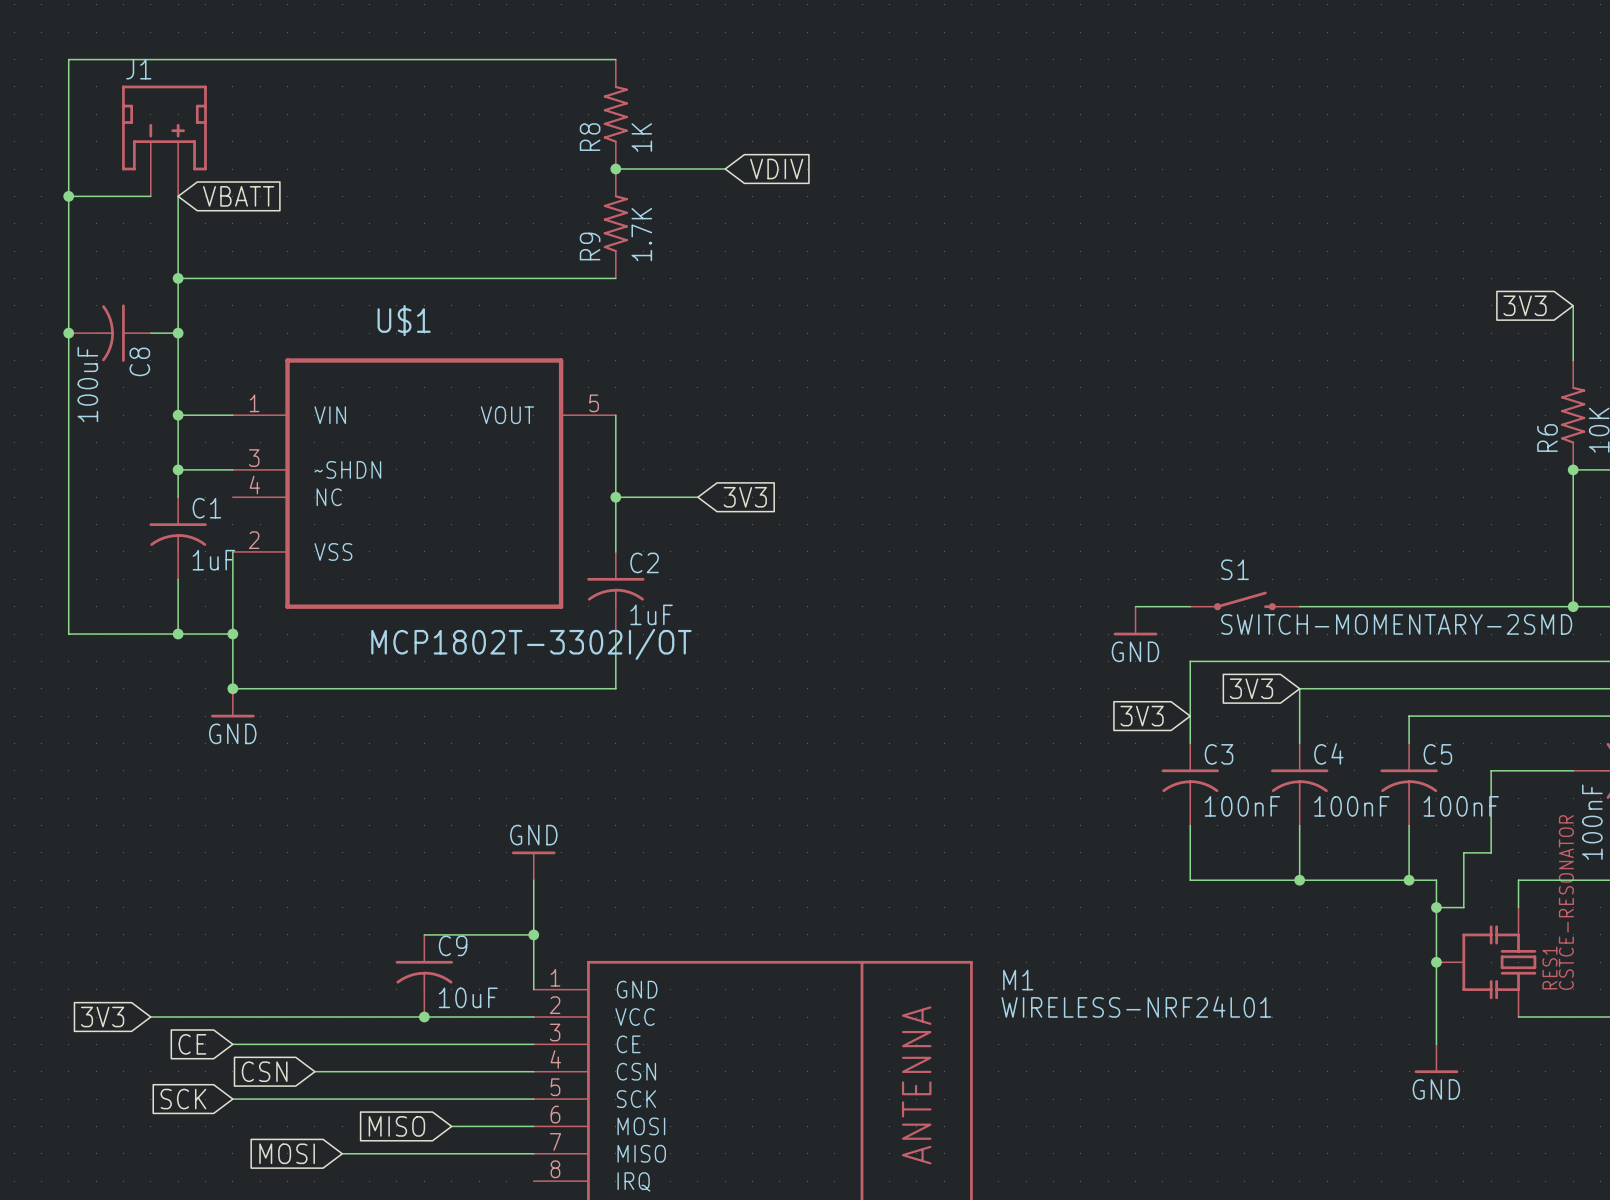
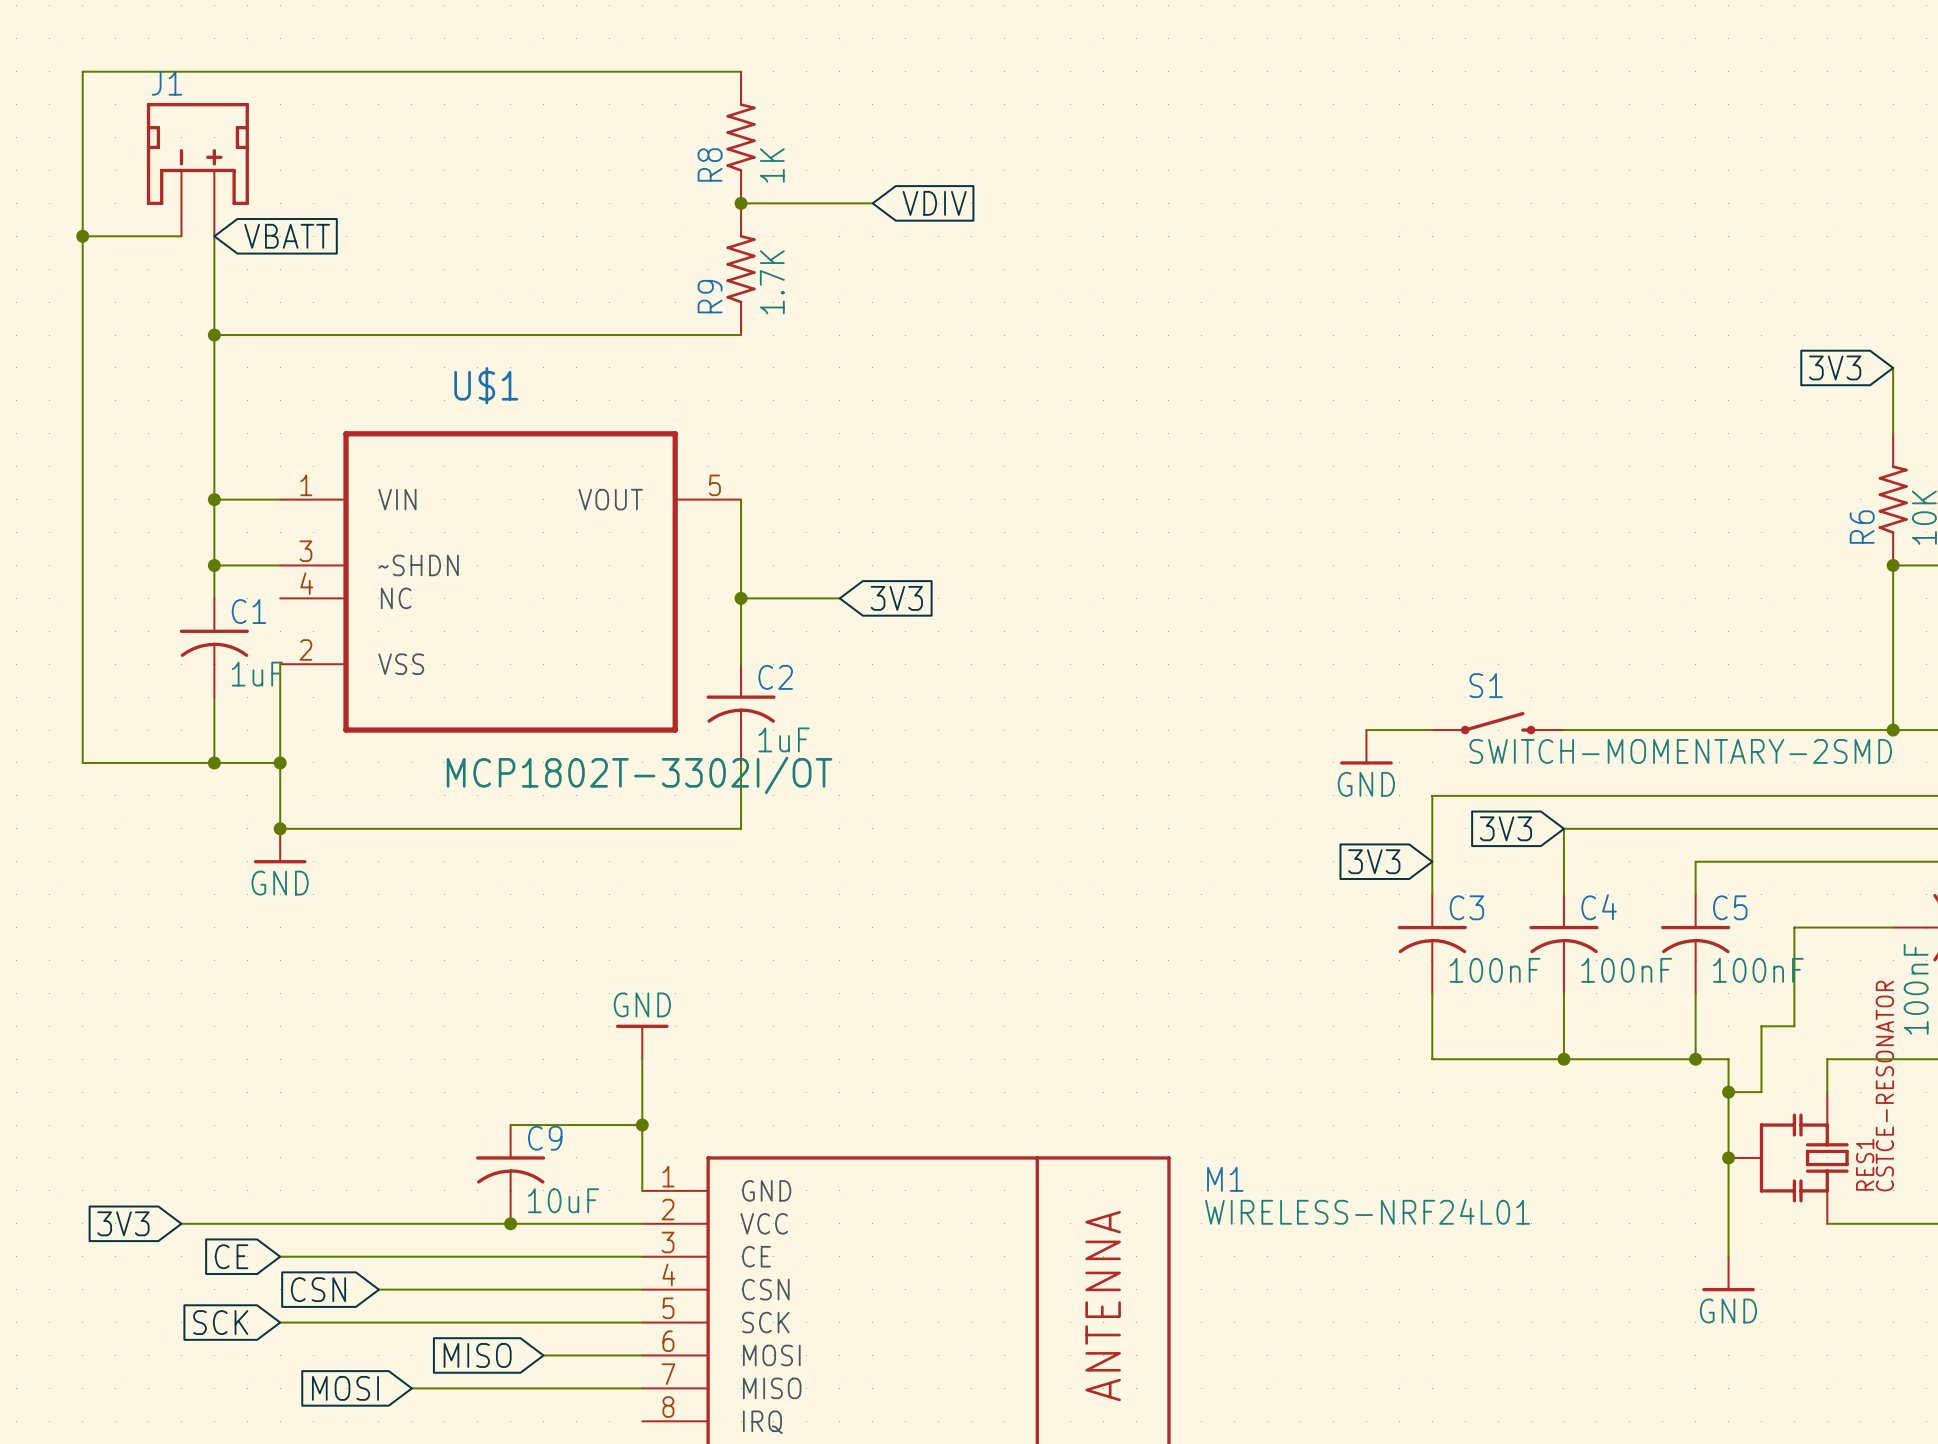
junction: (68, 333) -> none
C8: 100uF (109, 333) -> none
wire: (150, 333) (178, 333) -> none
junction: (178, 333) -> none

